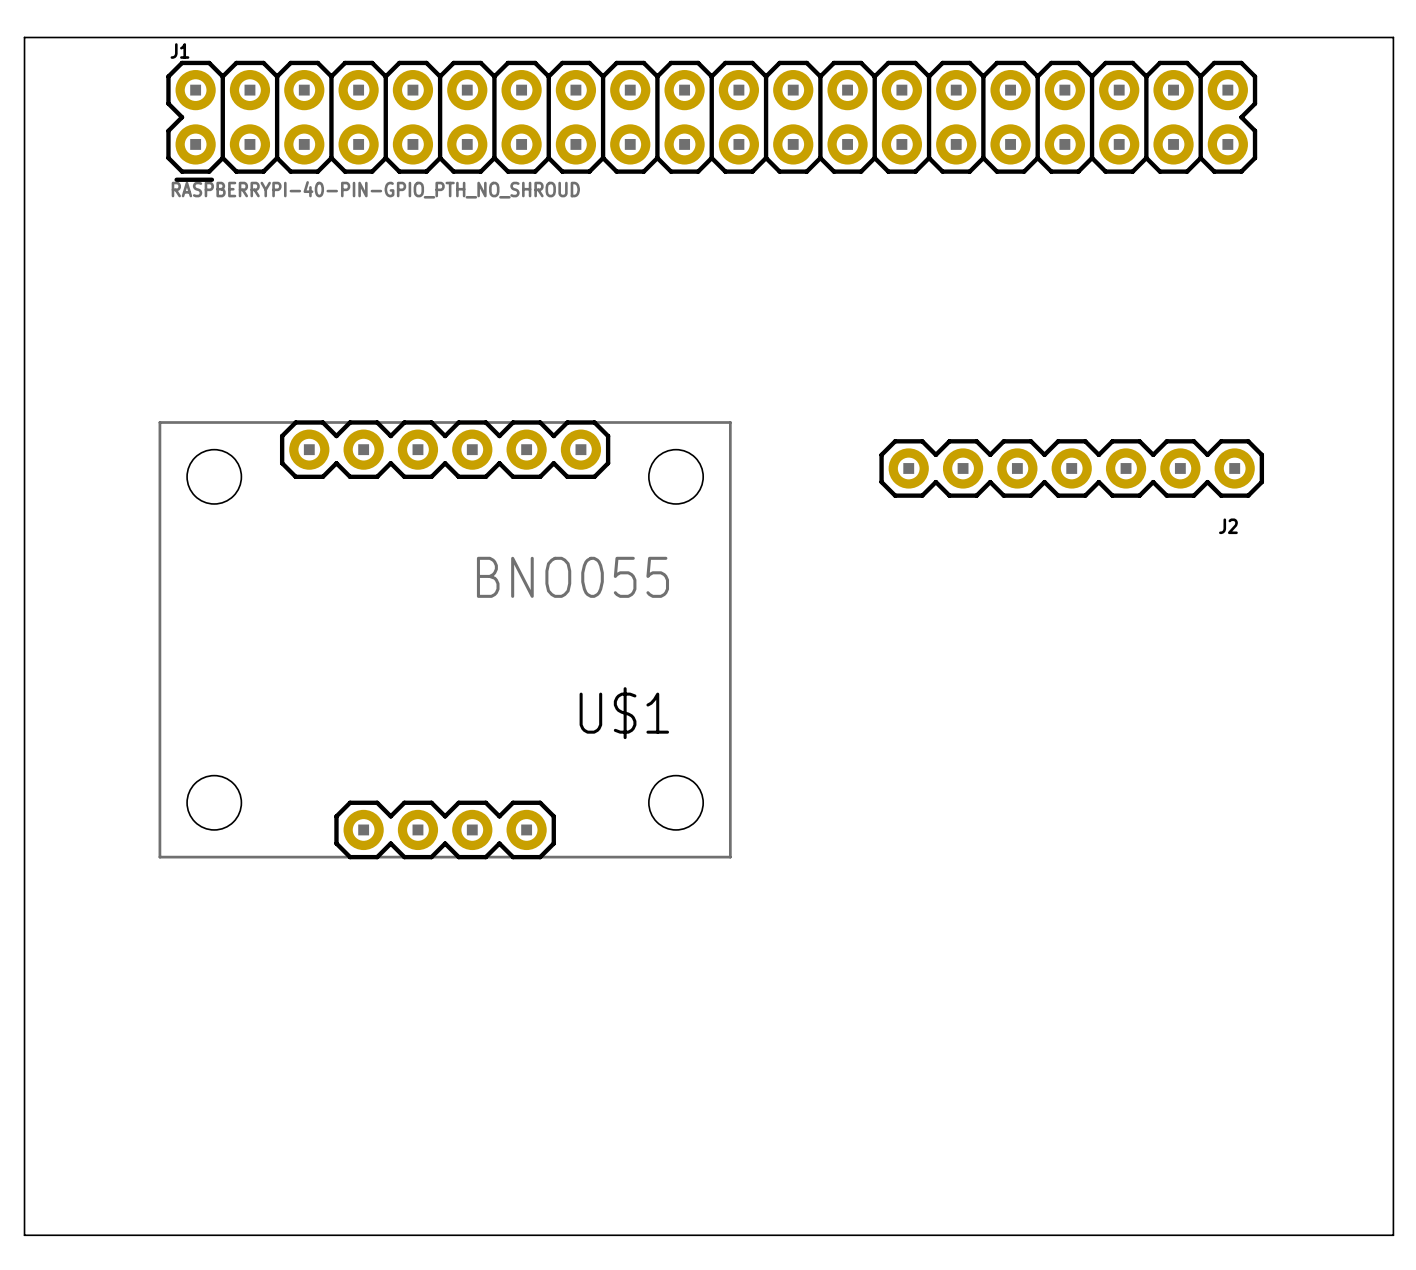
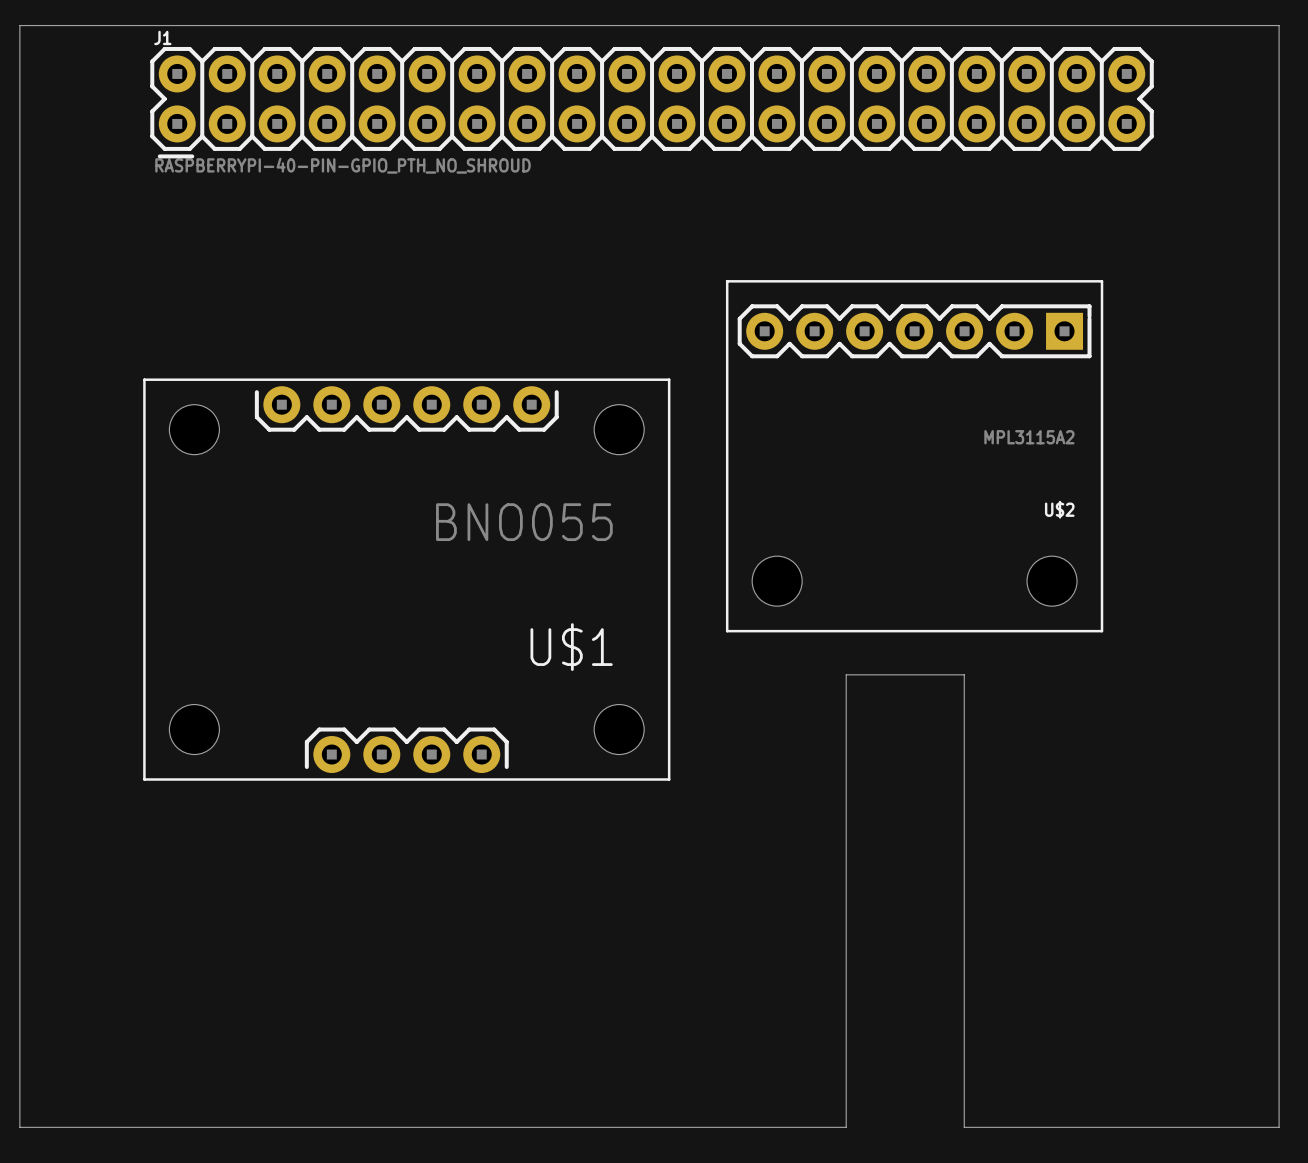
U$1 footprint: [158, 420, 732, 860] -> [143, 378, 671, 781]
J2: (1071, 468) -> none
U$2: none -> MPL3115A2 (914, 456)
board edge: (922, 1235) (1051, 1235) -> (846, 1127) (846, 674) (964, 674) (964, 1127)

